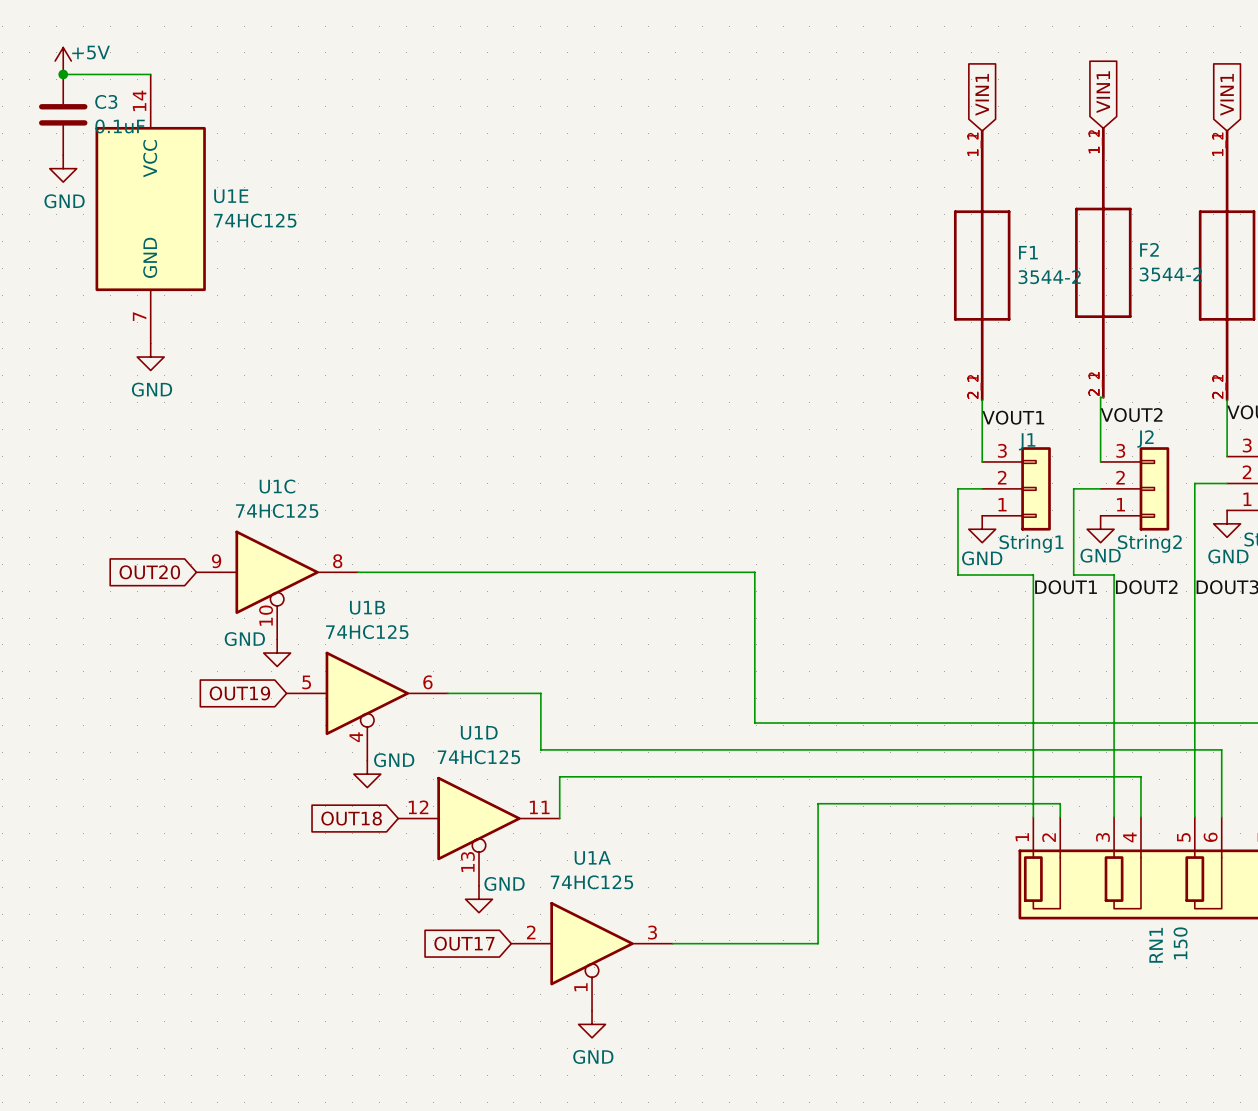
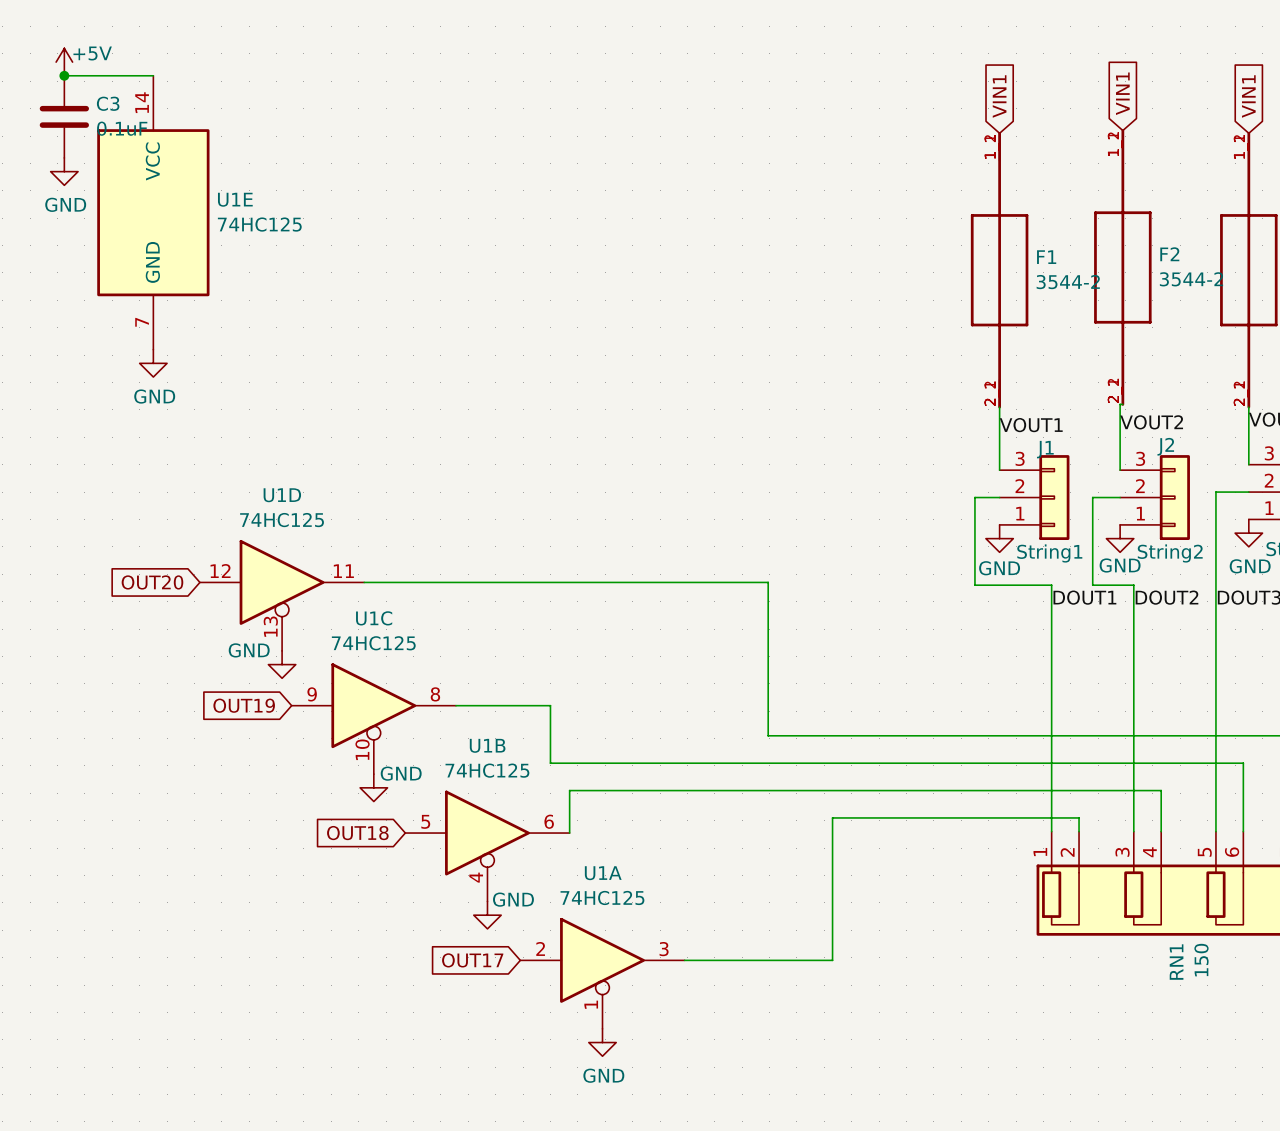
U1C position: (277, 585) -> (373, 718)
U1B position: (367, 706) -> (487, 846)
U1D position: (478, 831) -> (282, 595)

